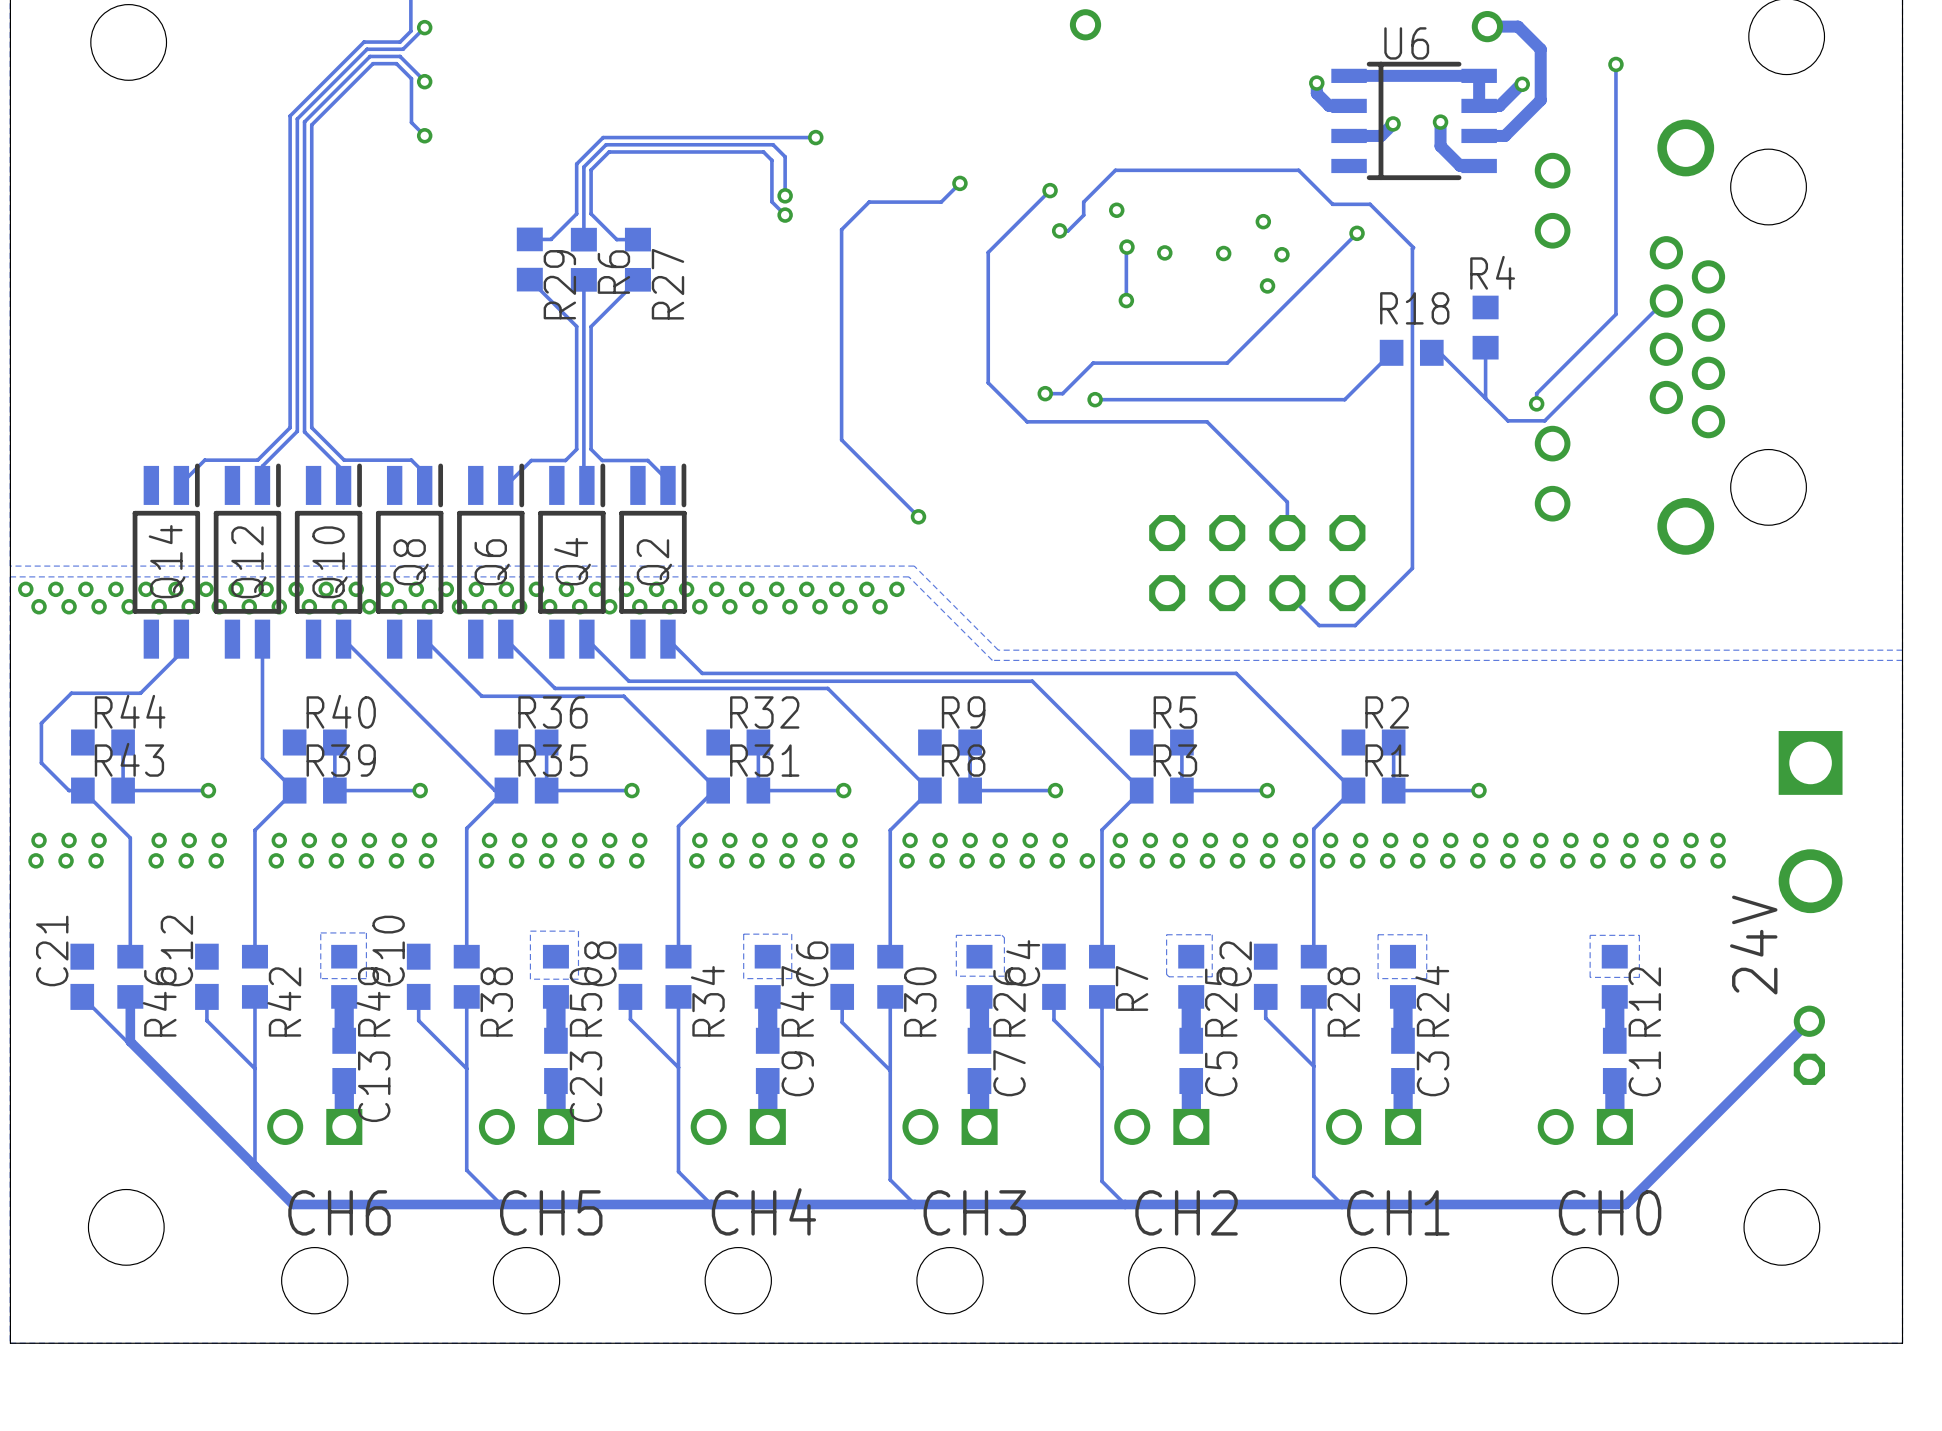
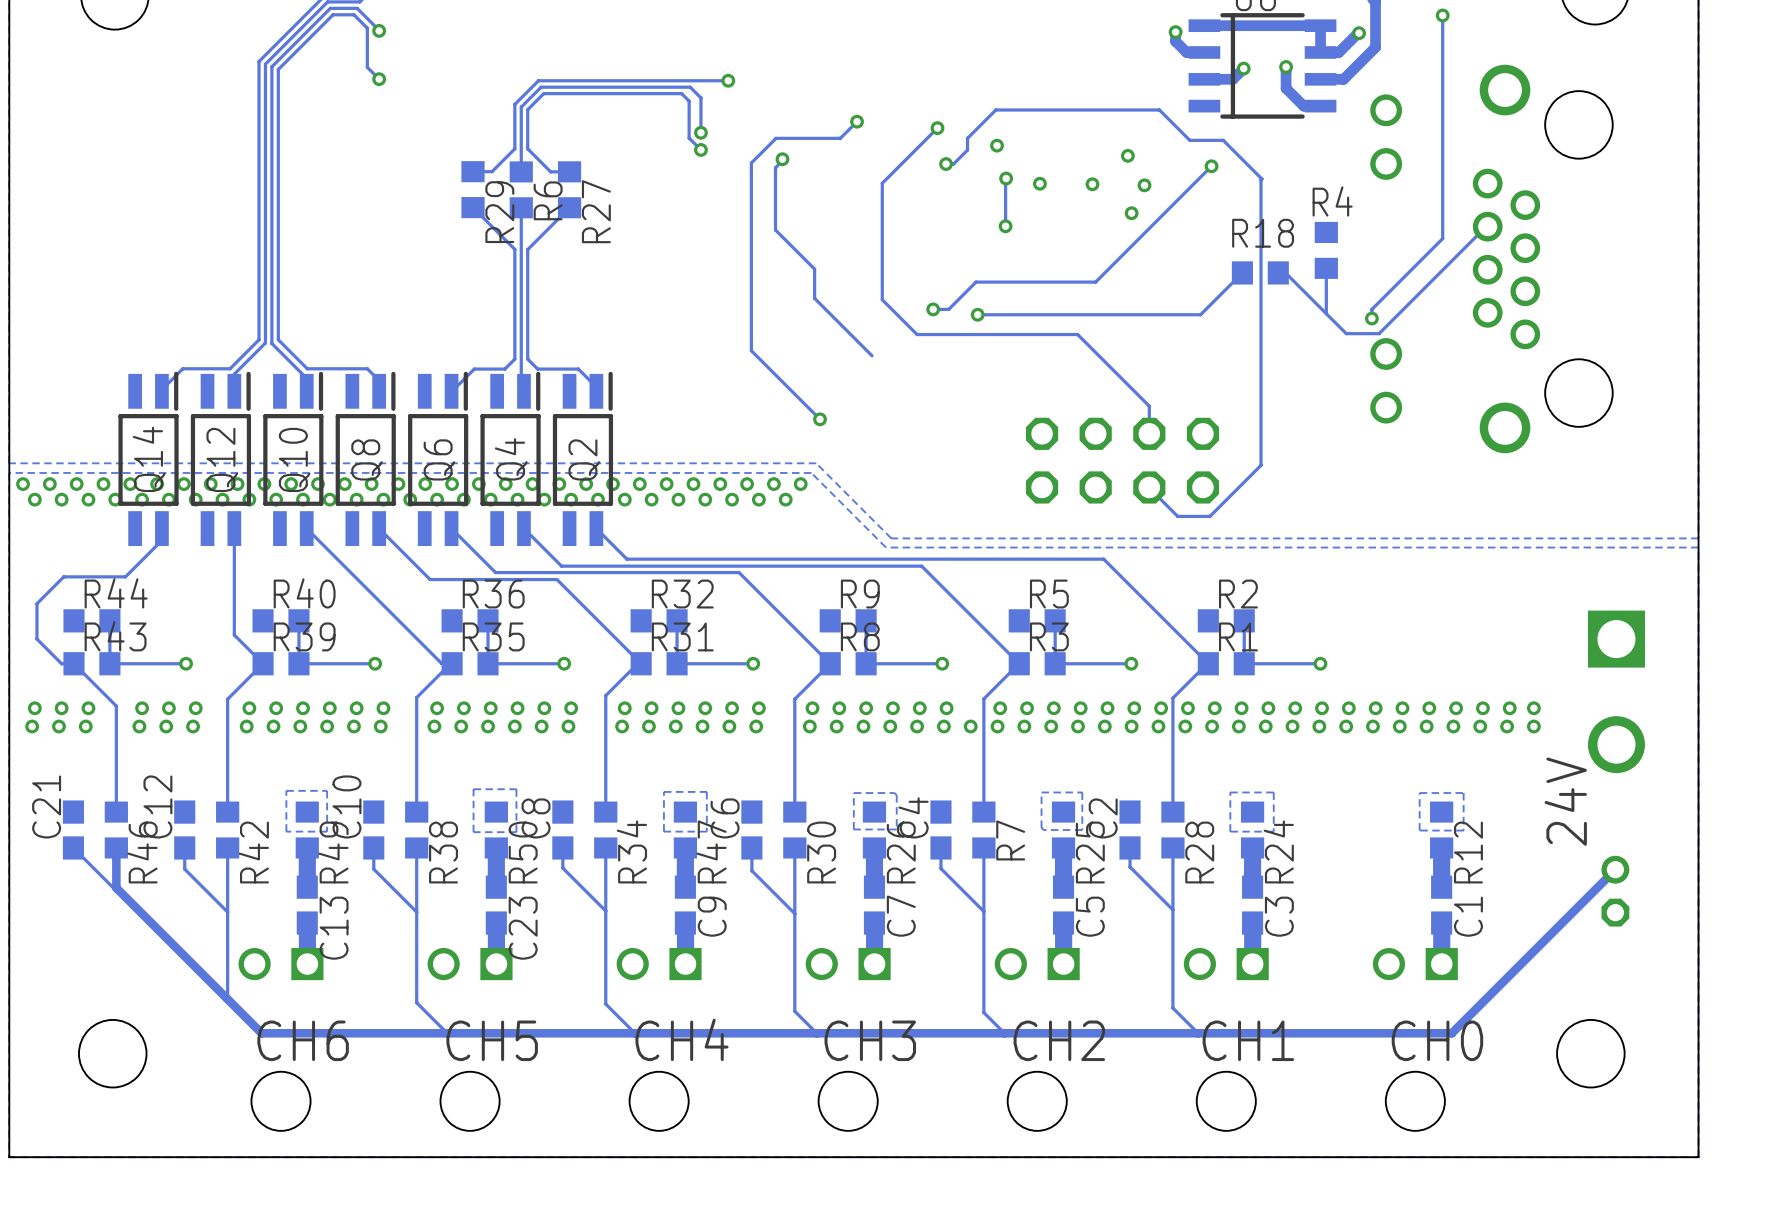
track: none -> (782, 159) (775, 167) (775, 229) (814, 269) (814, 298) (872, 355)
via: none -> (782, 159)

